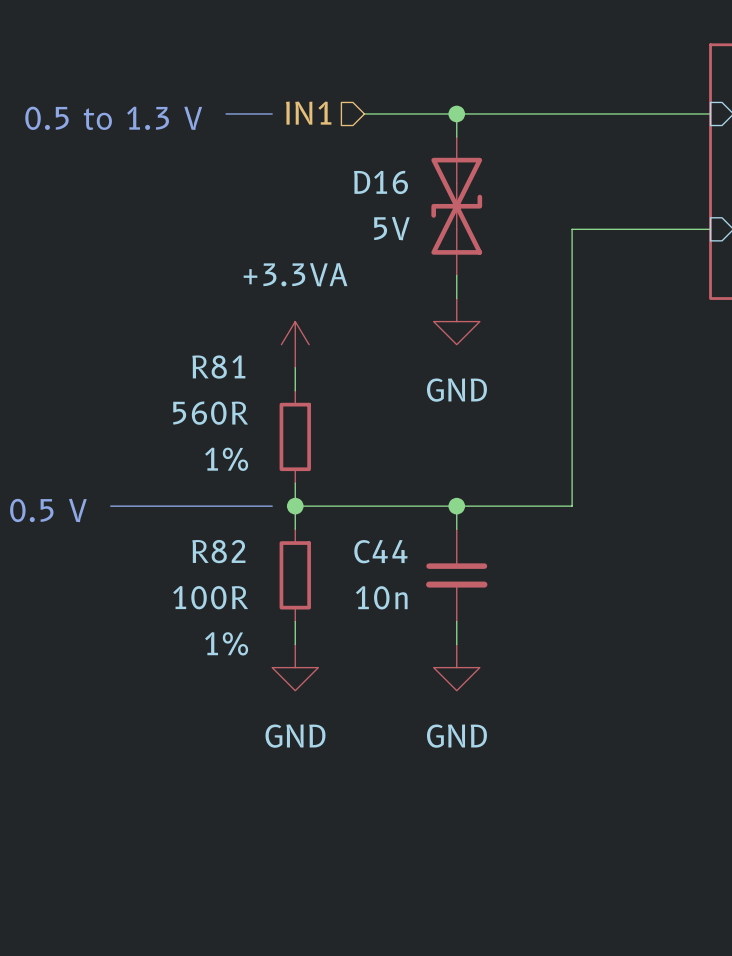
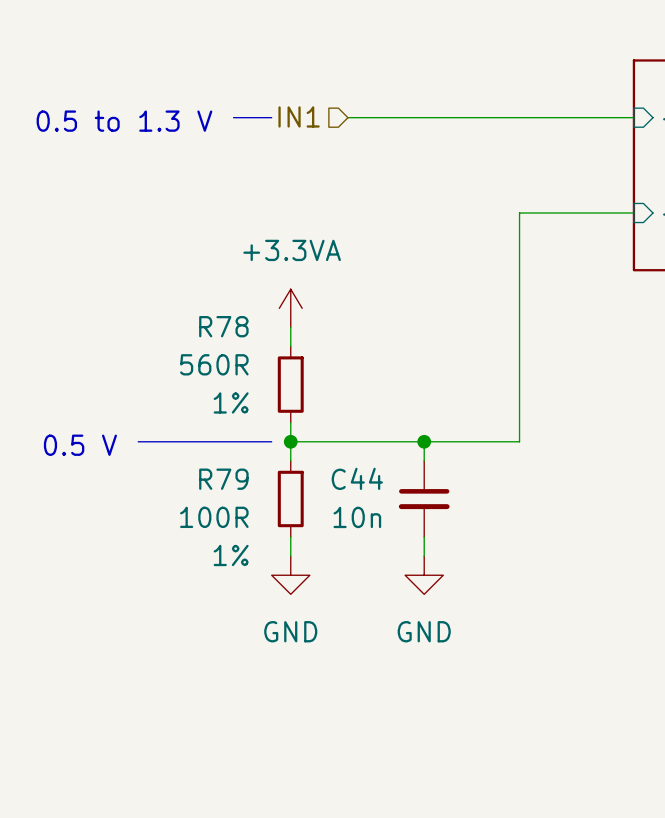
wire: (456, 113) (456, 137) -> none
junction: (456, 113) -> none
D16: 5V (456, 206) -> none
wire: (456, 275) (456, 298) -> none
power symbol: GND (456, 321) -> none
R81 name: R81 (218, 367) -> R78 (223, 326)
R82 name: R82 (218, 551) -> R79 (223, 479)

